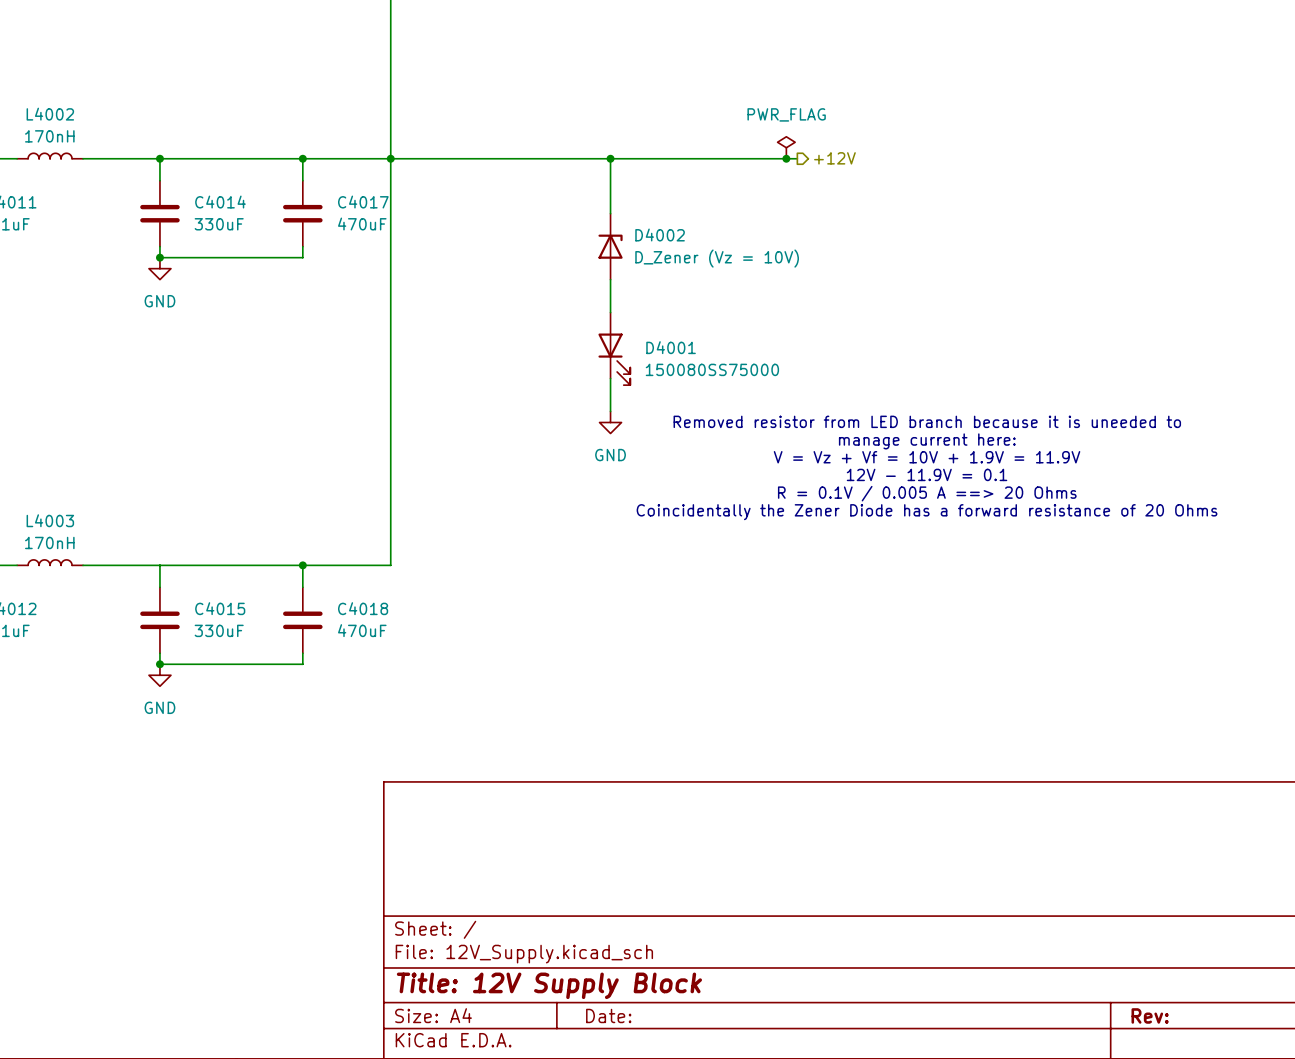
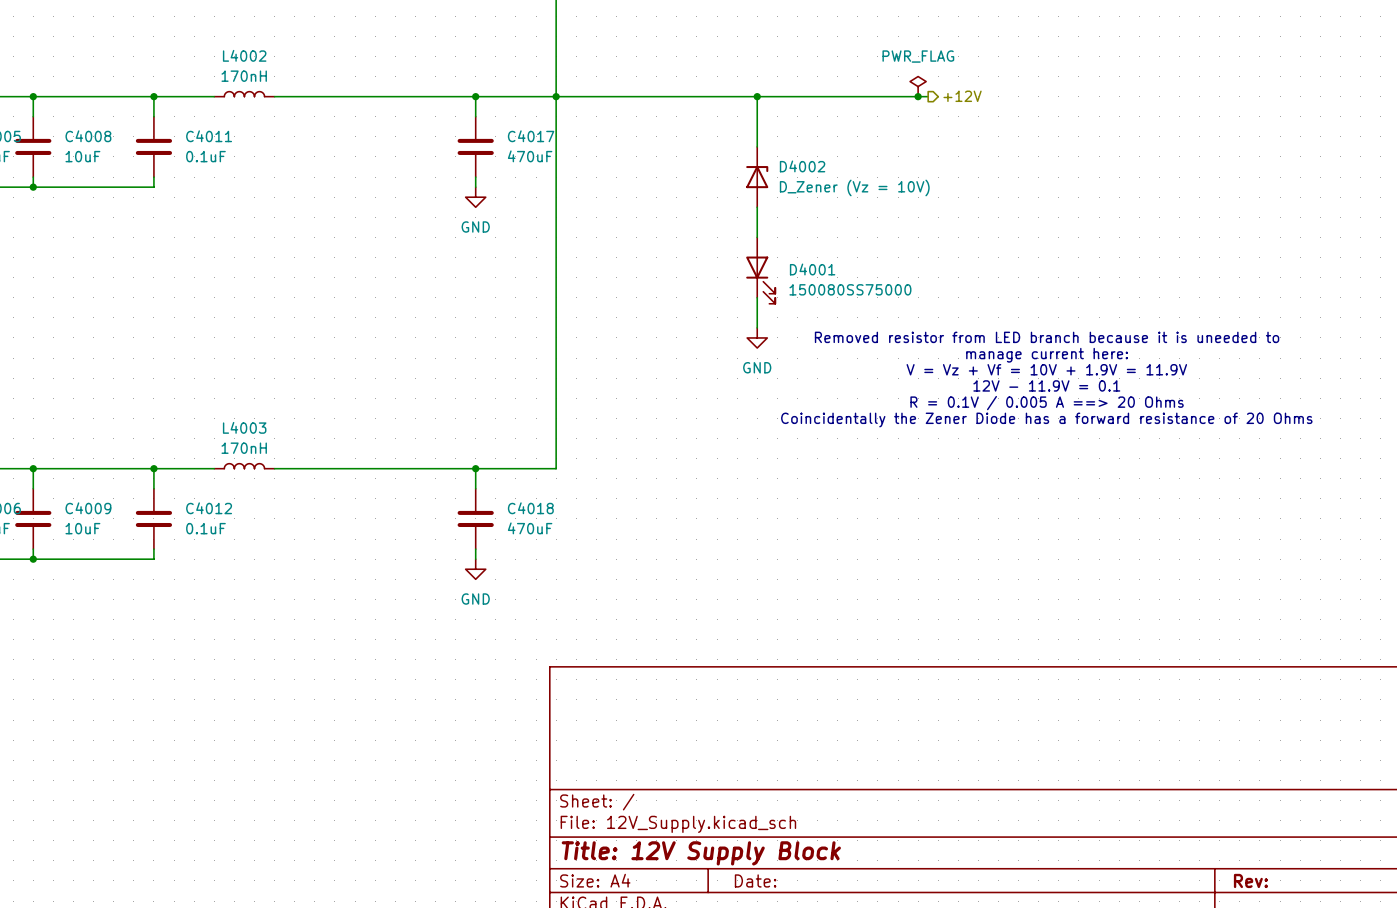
wire: (159, 158) (159, 180) -> none
junction: (159, 158) -> none
C4014: 330uF (159, 213) -> none
wire: (159, 246) (159, 257) (302, 257) -> none
junction: (159, 257) -> none
power symbol position: GND (159, 268) -> GND (475, 197)
wire: (159, 565) (159, 587) -> none
C4015: 330uF (159, 620) -> none
wire: (159, 653) (159, 664) (302, 664) -> none
junction: (159, 664) -> none
power symbol position: GND (159, 675) -> GND (475, 569)

